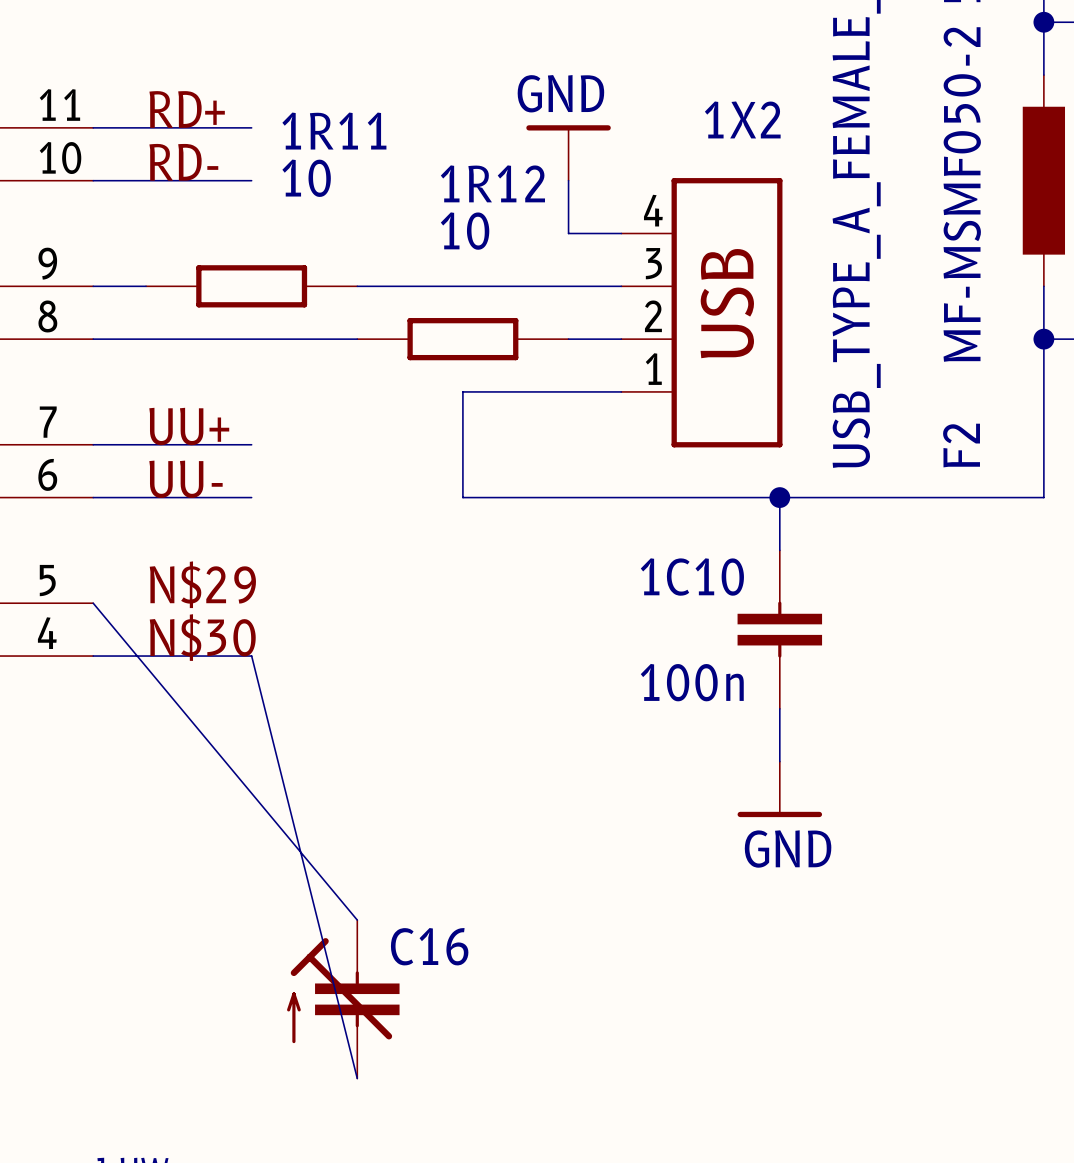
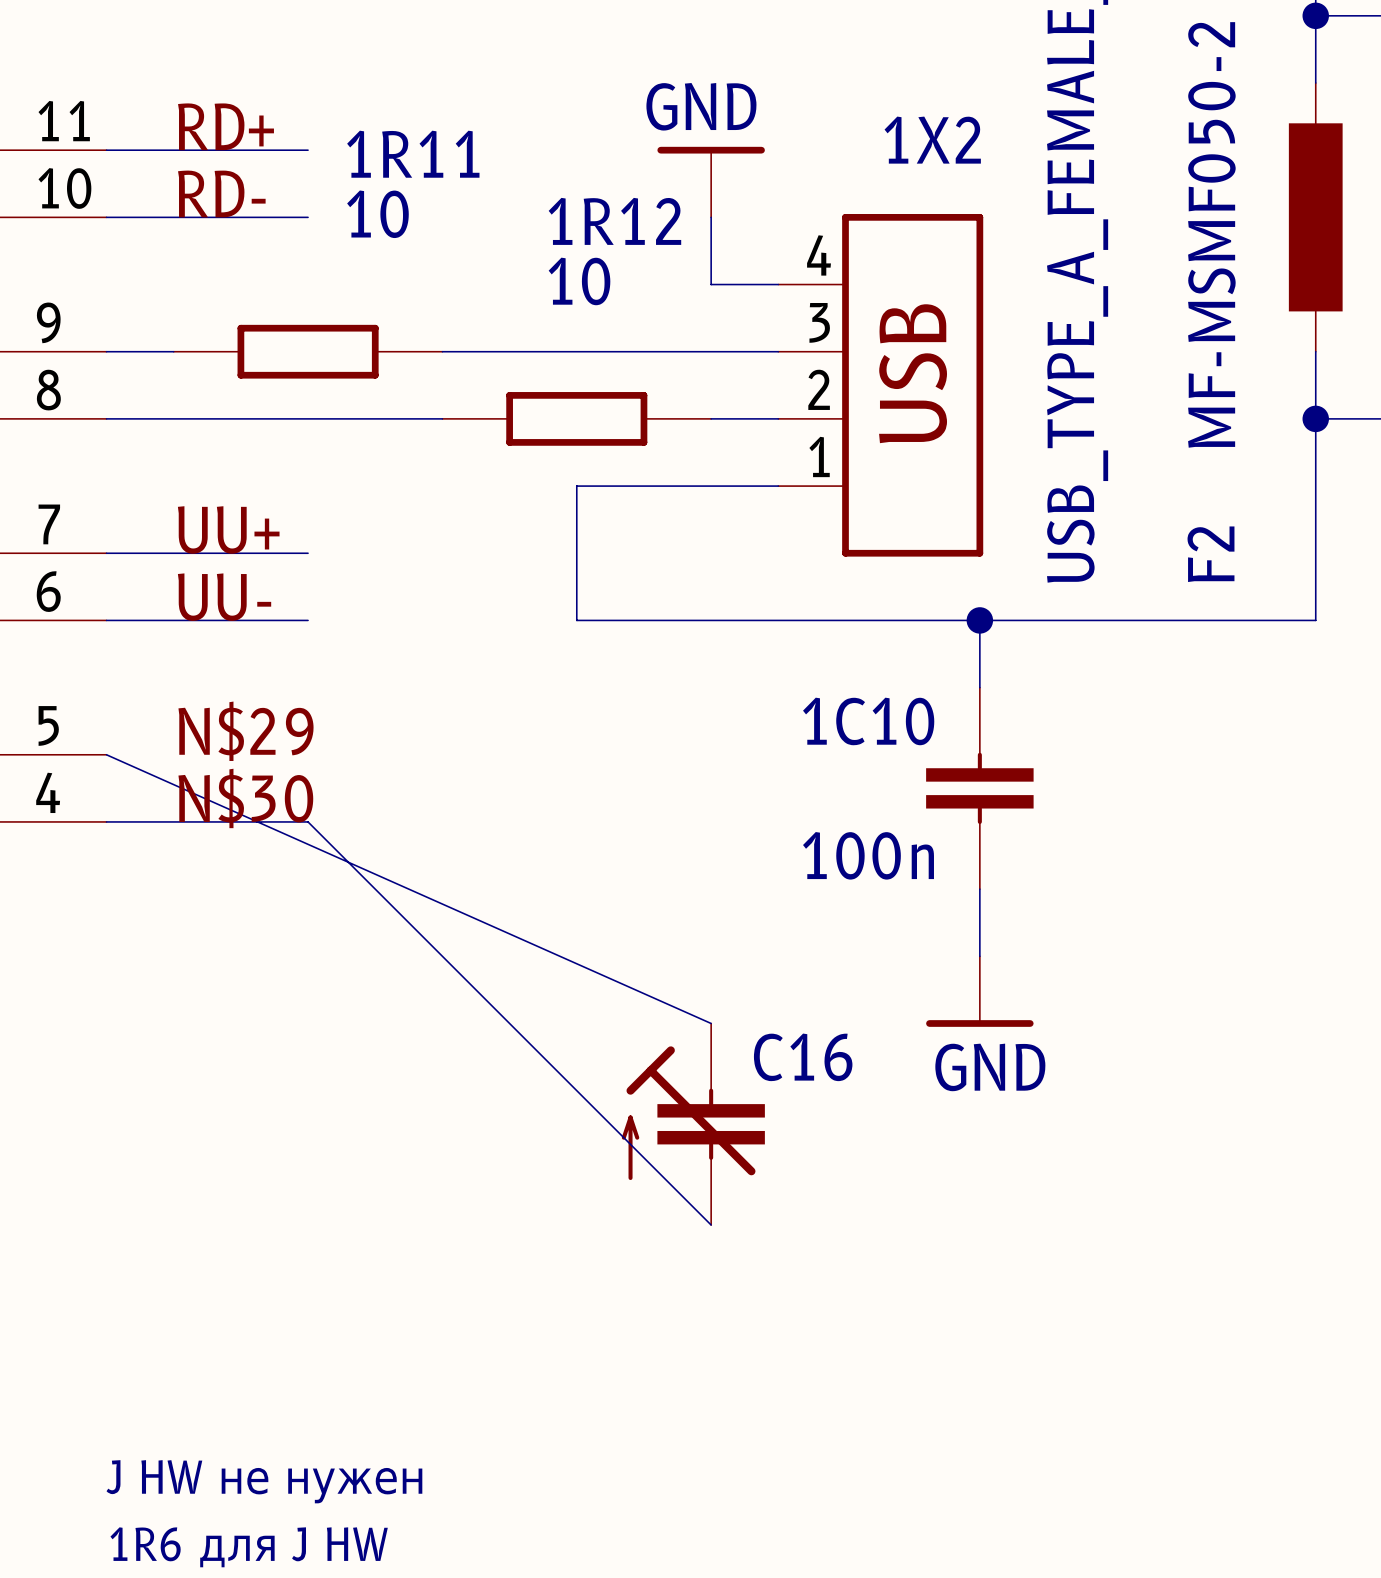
wire: (93, 603) (357, 920) -> (106, 754) (711, 1023)
wire: (251, 656) (357, 1078) -> (308, 821) (711, 1225)
C16 position: (343, 999) -> (693, 1124)

